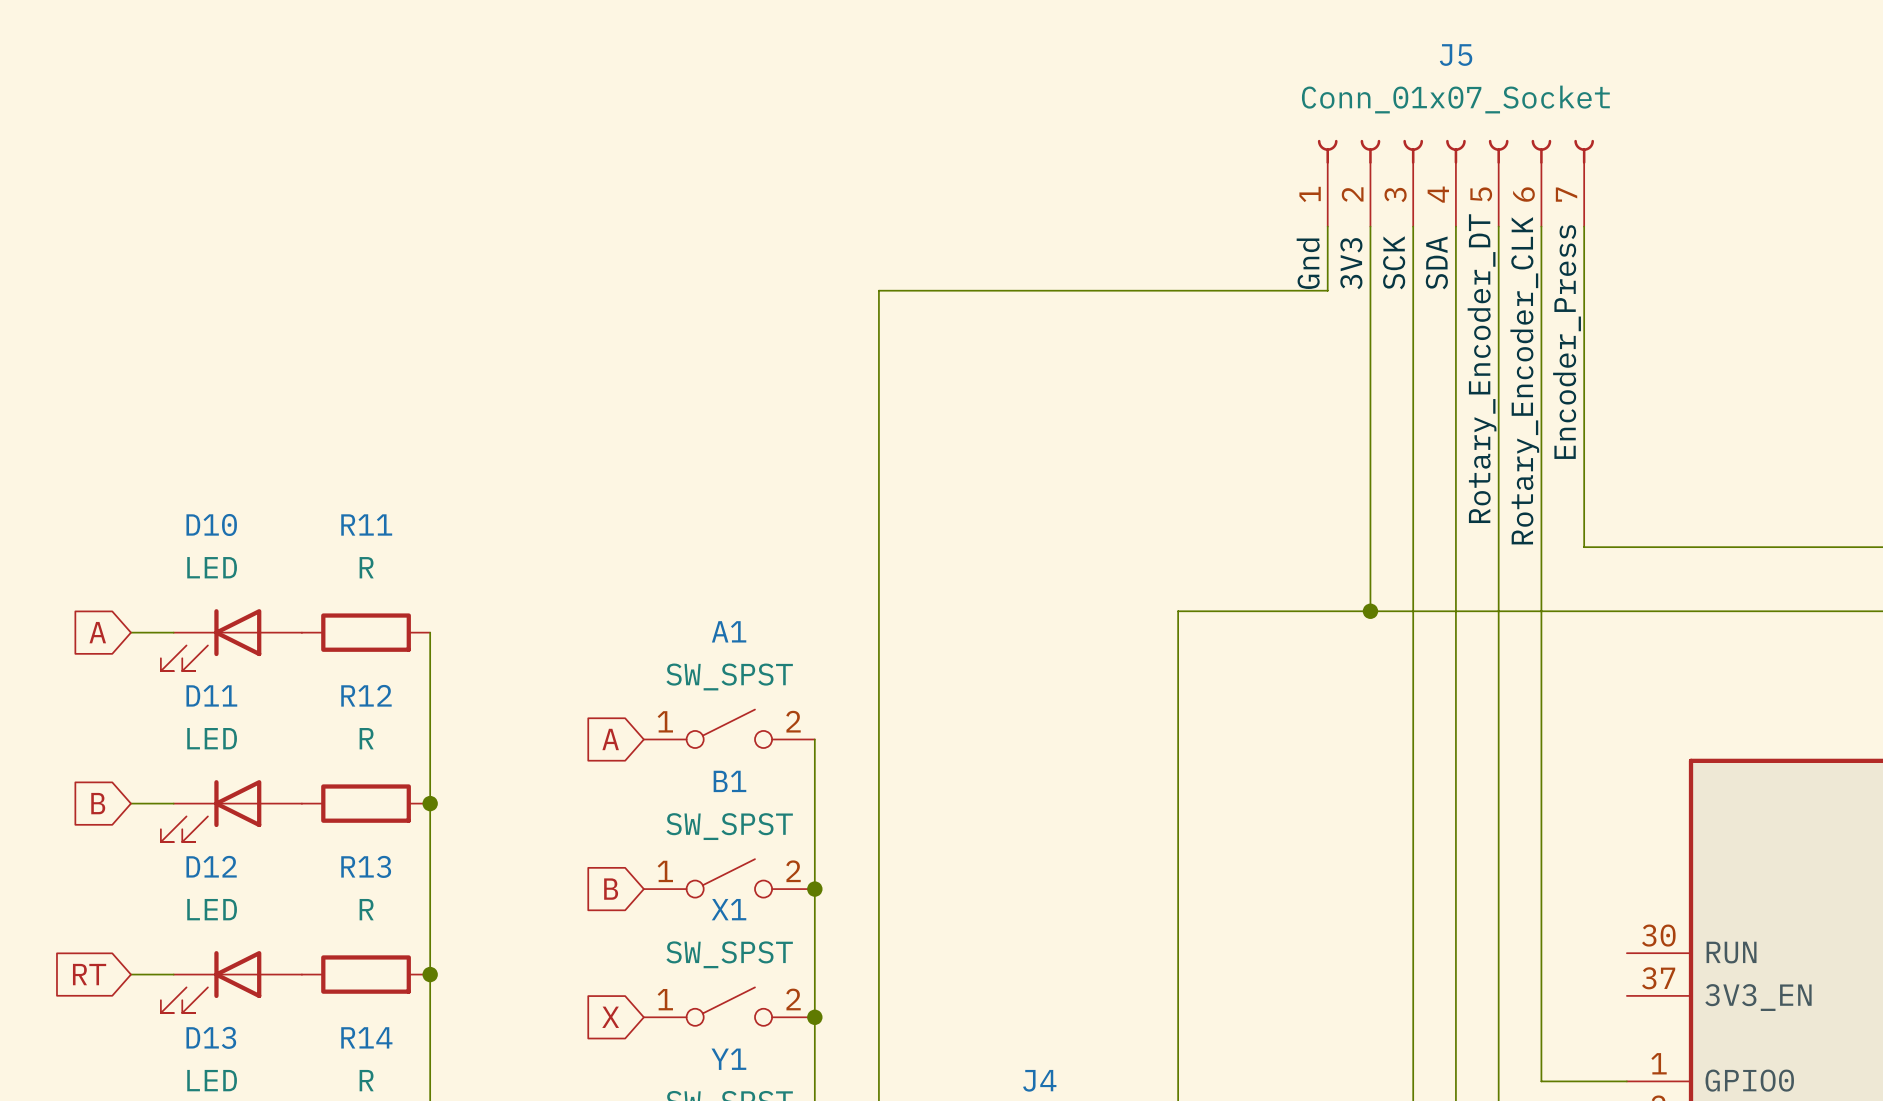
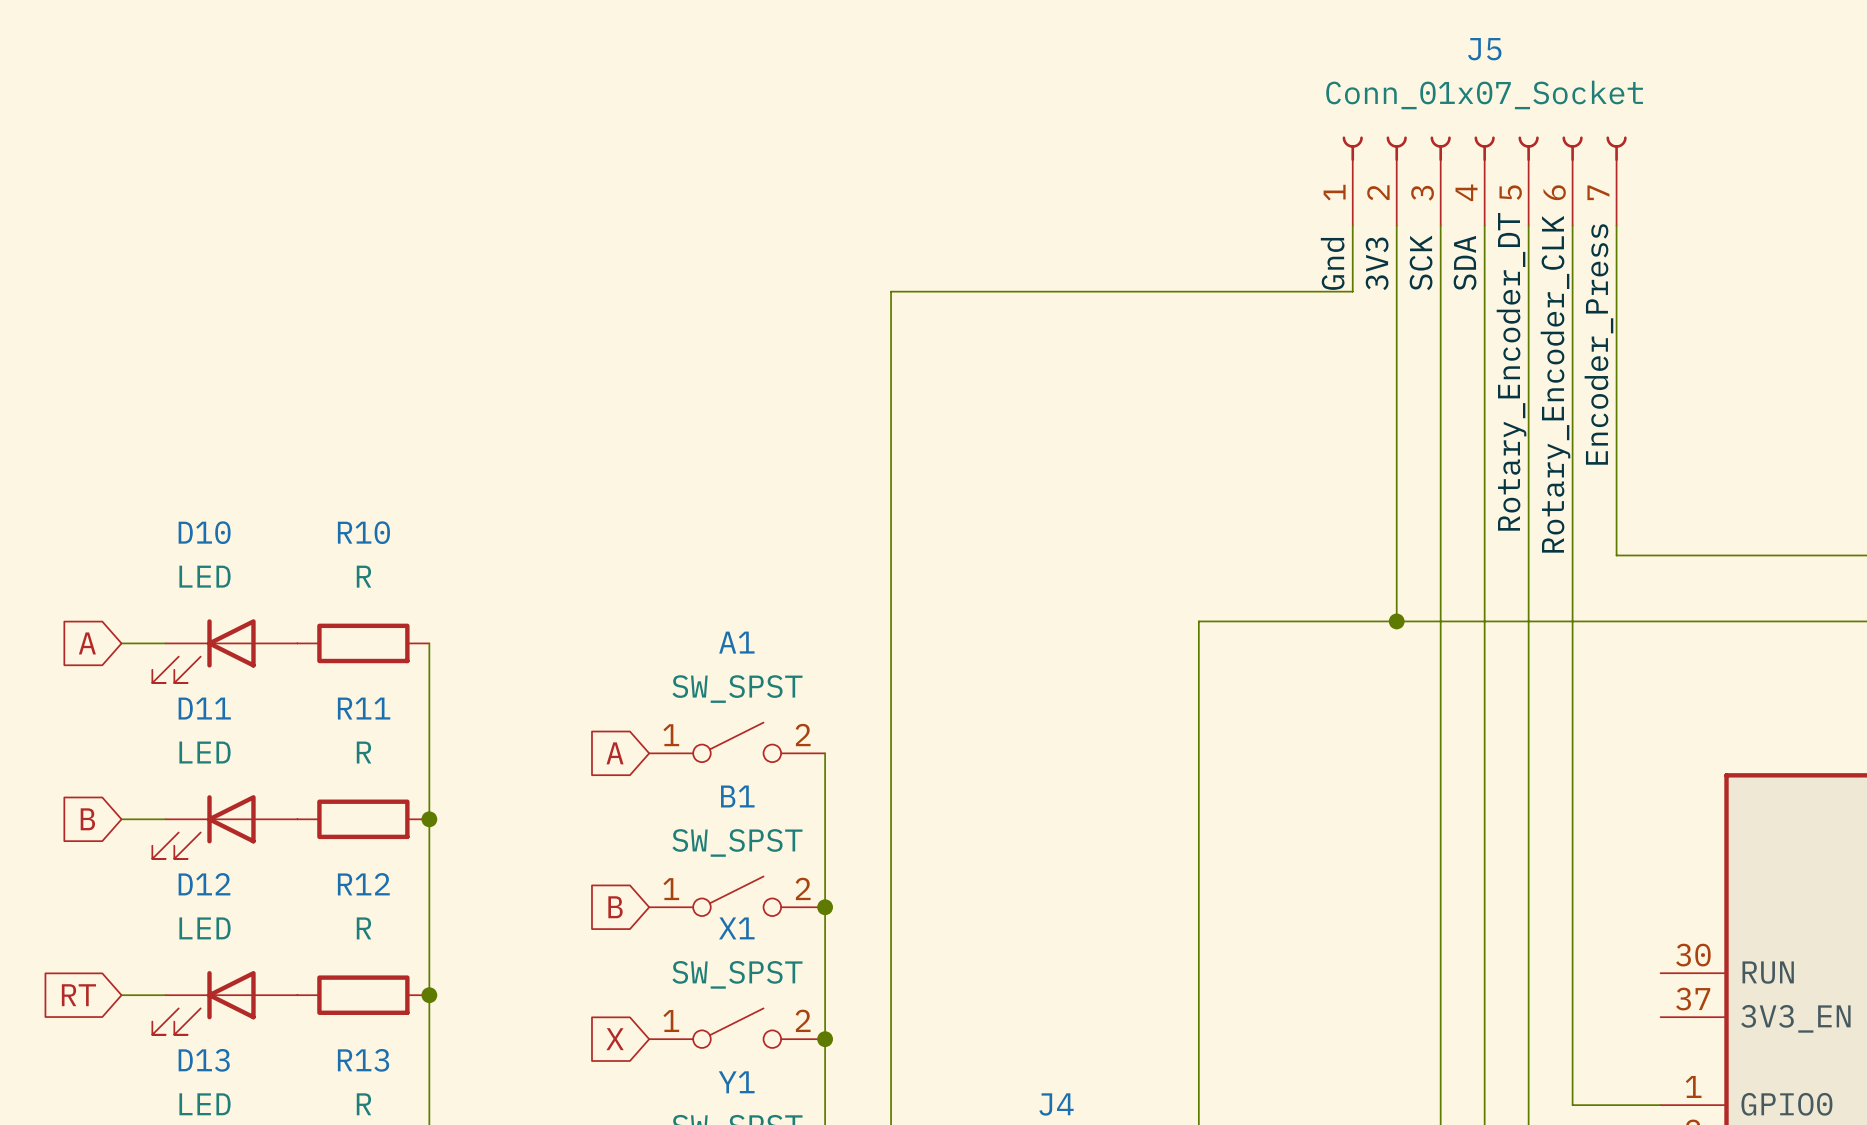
R11 name: R11 (366, 524) -> R10 (363, 532)
R12 name: R12 (366, 695) -> R11 (364, 708)
R13 name: R13 (366, 866) -> R12 (363, 884)
R14 name: R14 (366, 1037) -> R13 (363, 1060)

